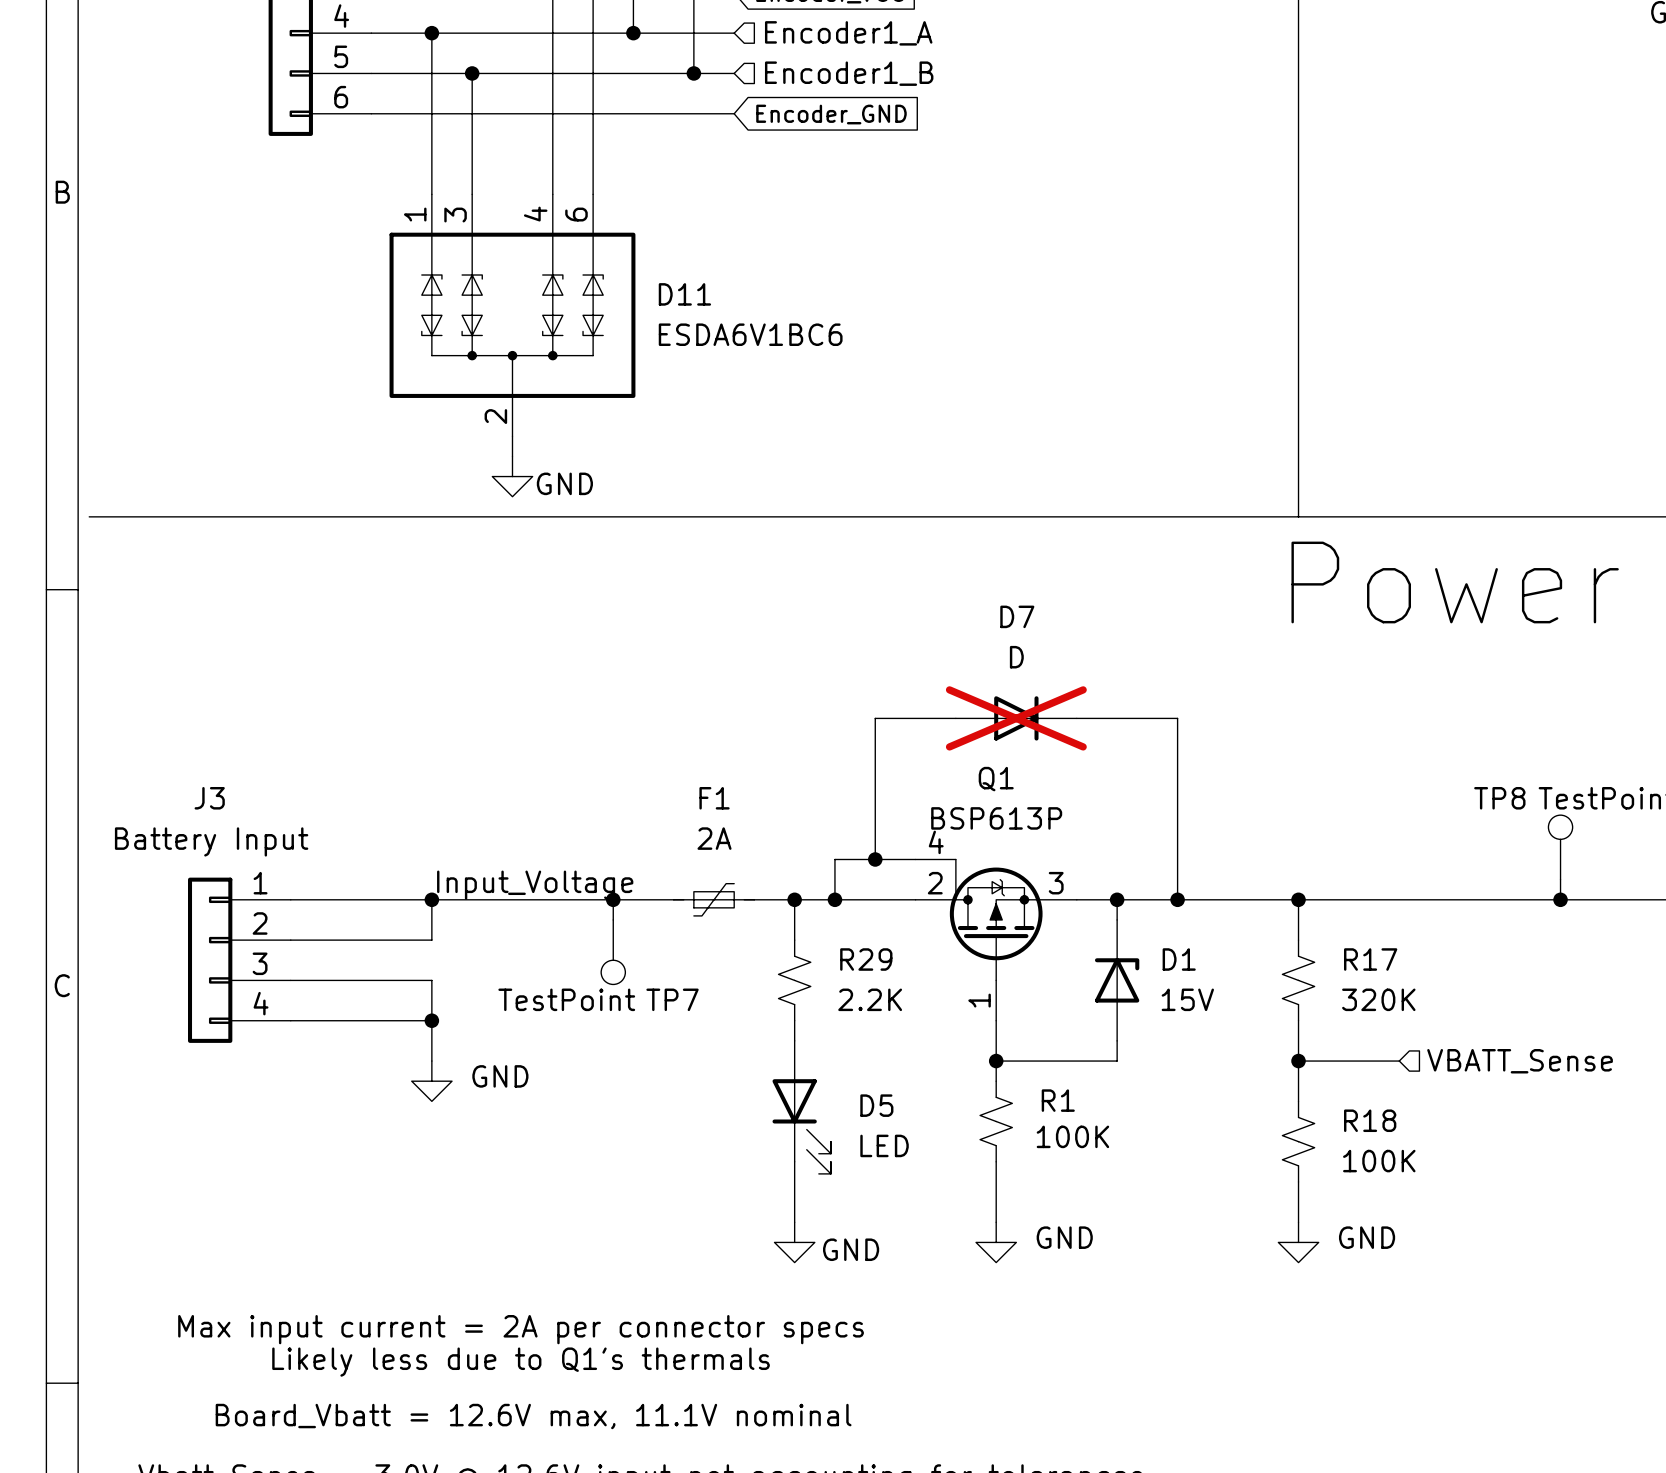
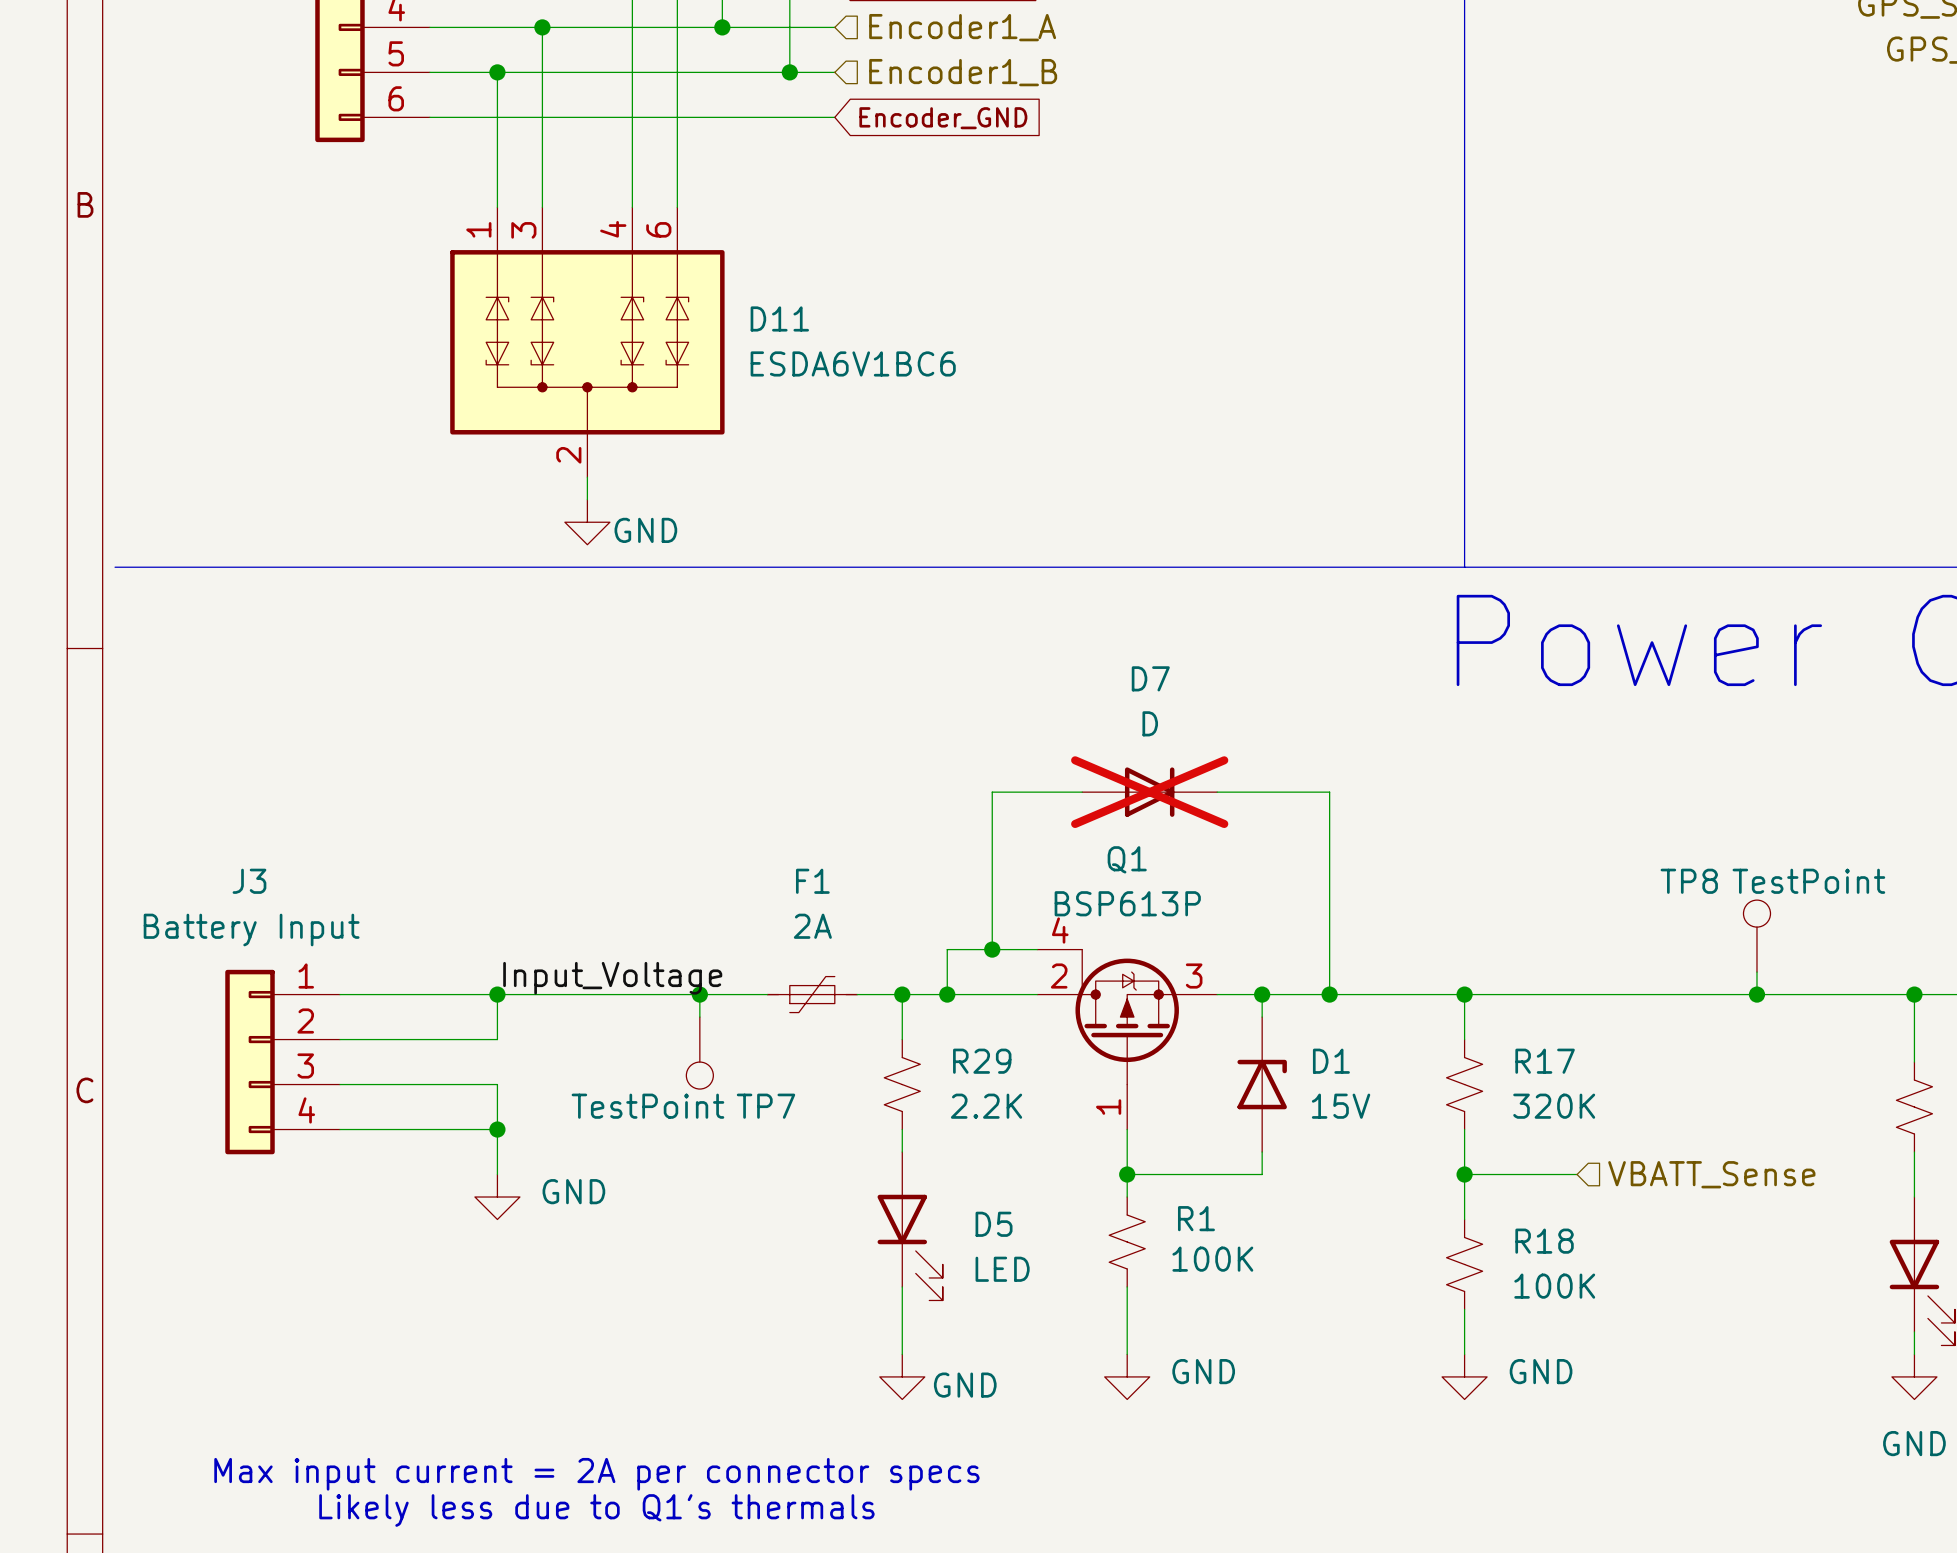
wire: (431, 33) (431, 73) -> (542, 27) (542, 72)
junction: (431, 33) -> none
junction: none -> (542, 27)
junction: none -> (497, 72)
junction: (472, 73) -> none

